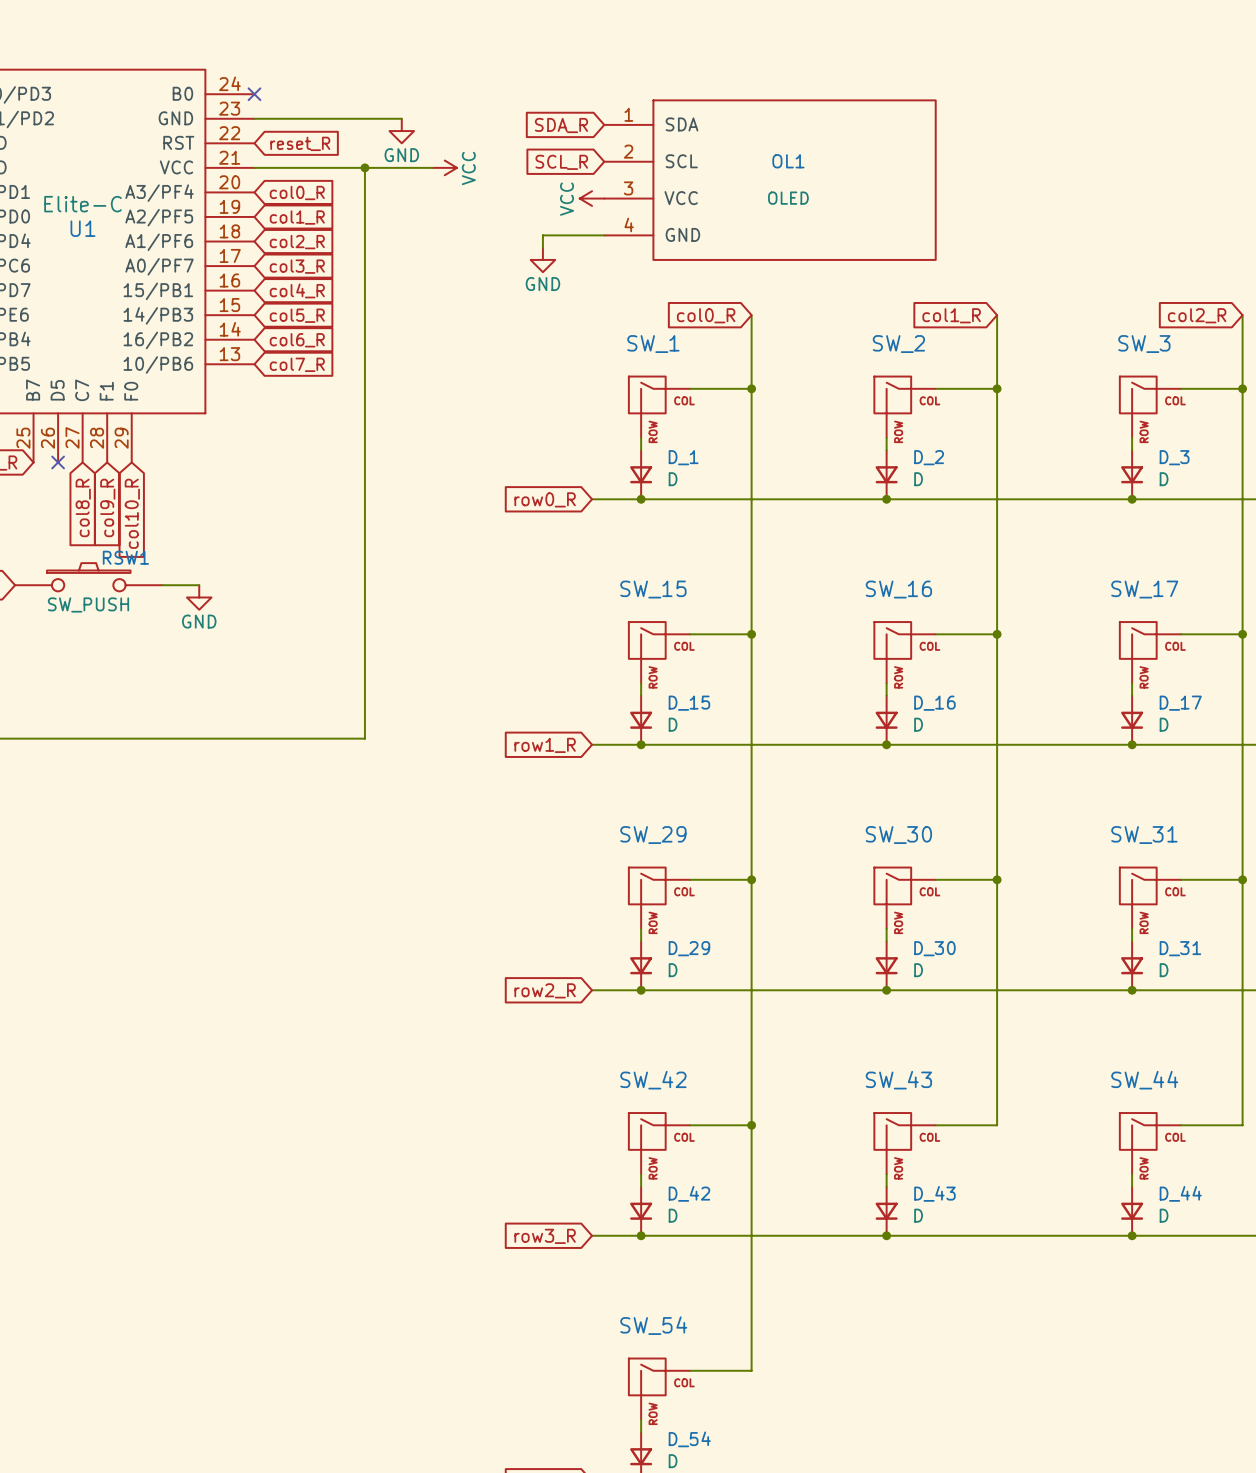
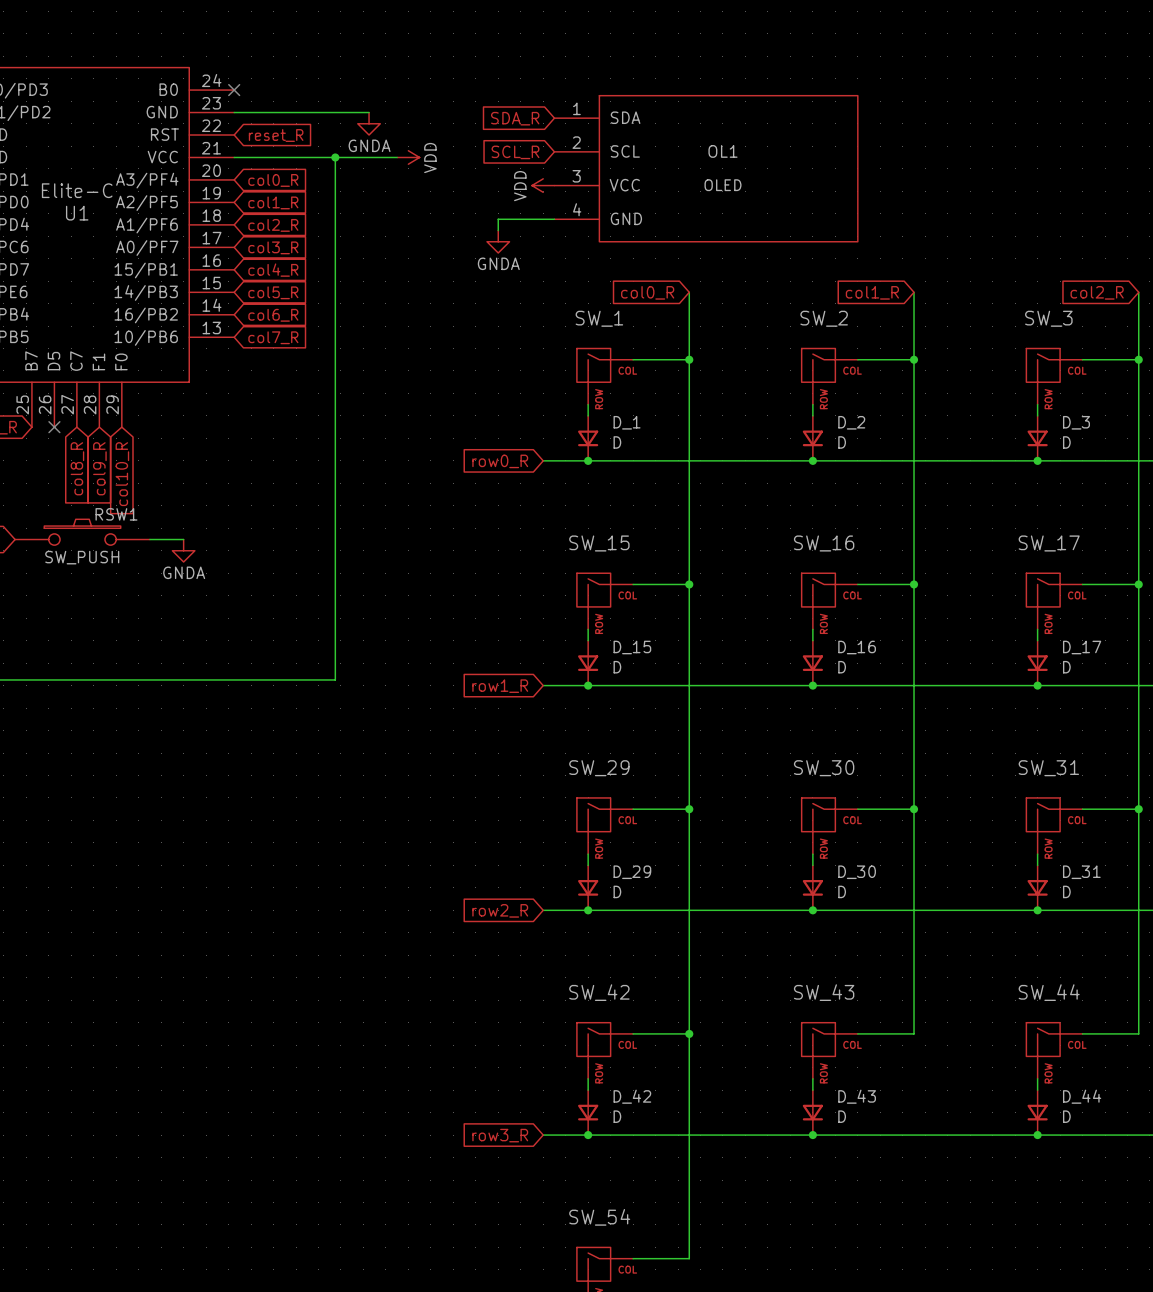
power symbol: GND (401, 131) -> GNDA (369, 123)
power symbol: VCC (444, 167) -> VDD (408, 157)
power symbol: VCC (592, 198) -> VDD (543, 185)
power symbol: GND (542, 259) -> GNDA (498, 241)
power symbol: GND (199, 597) -> GNDA (183, 550)

